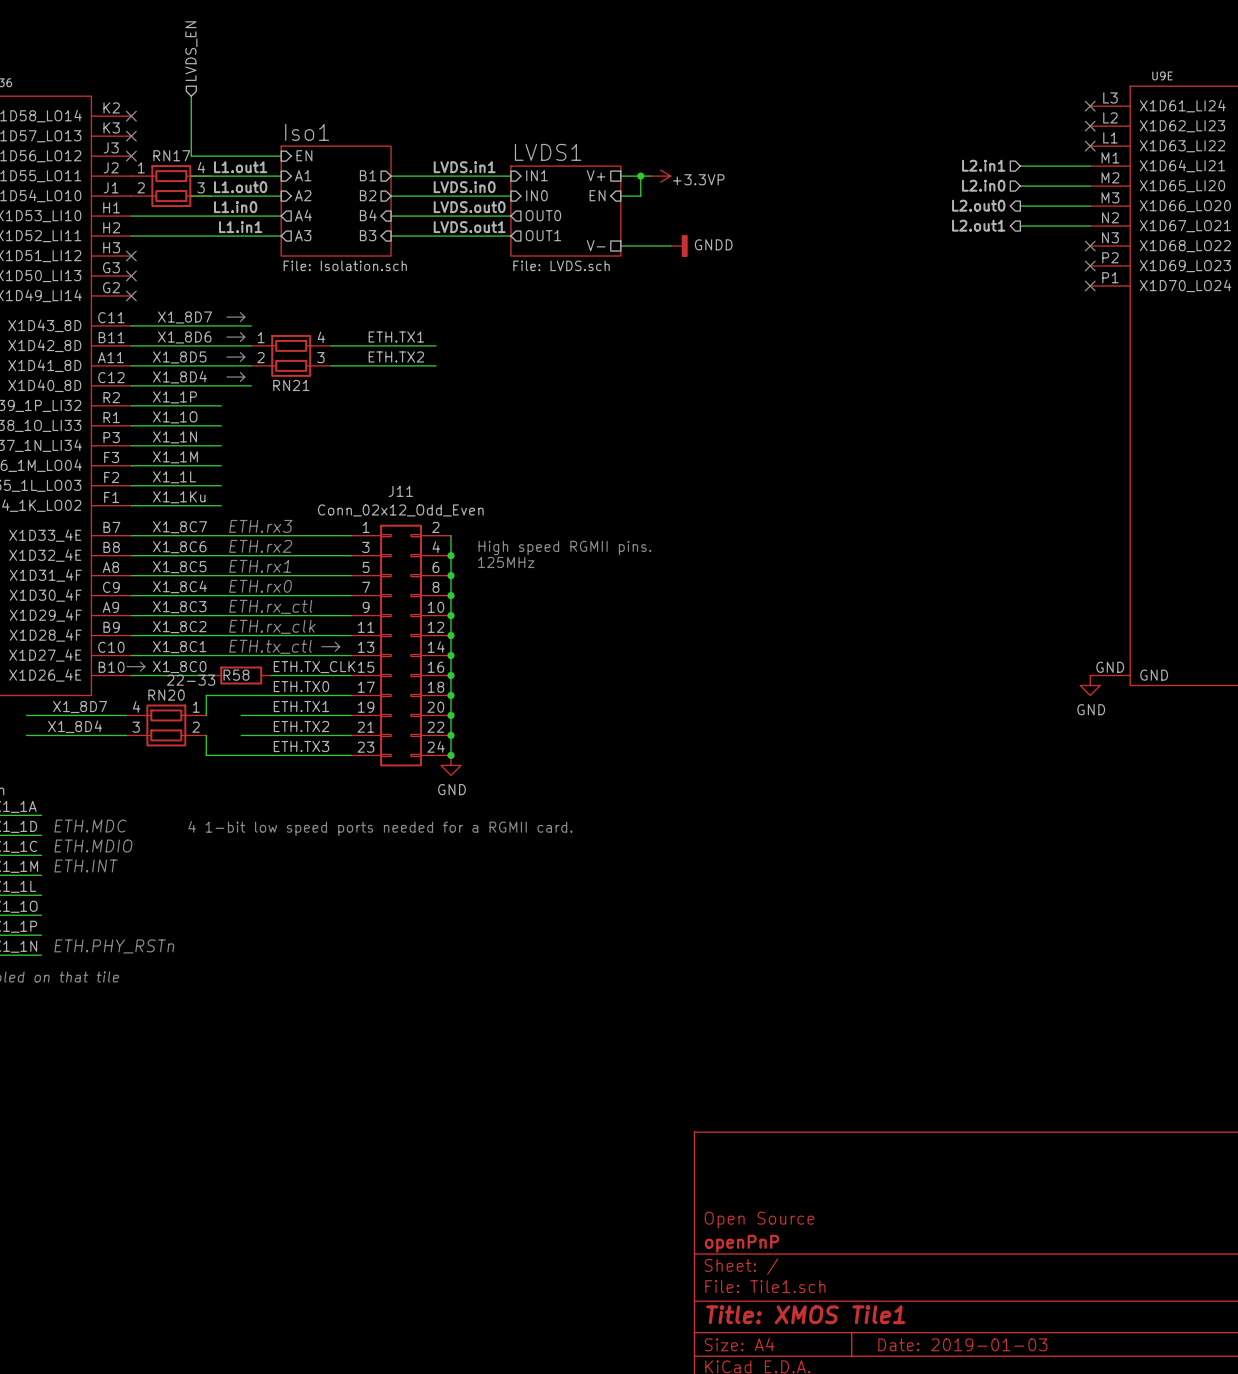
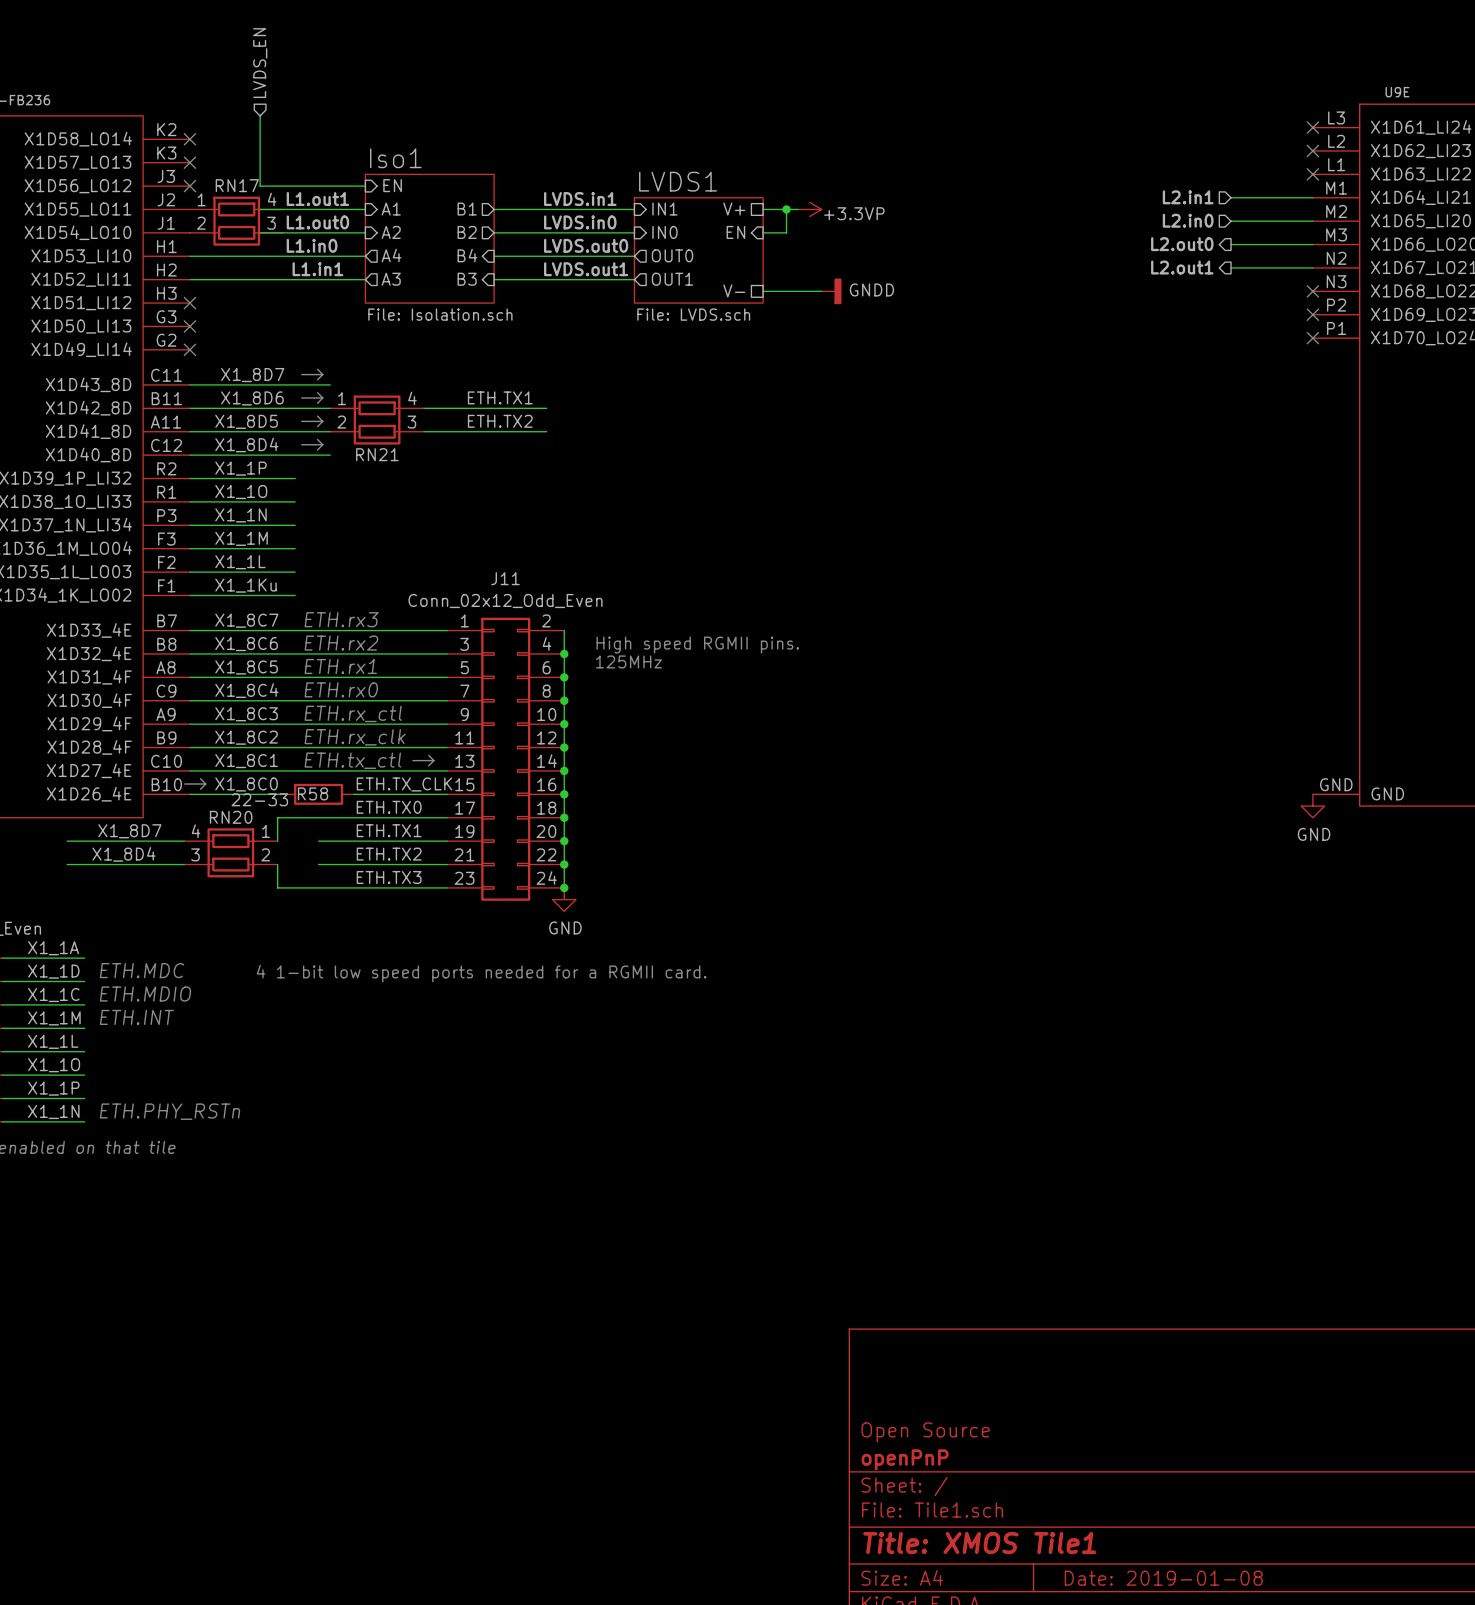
title block: Date: 2019-01-03 (962, 1344) -> Date: 2019-01-08 (1163, 1578)

